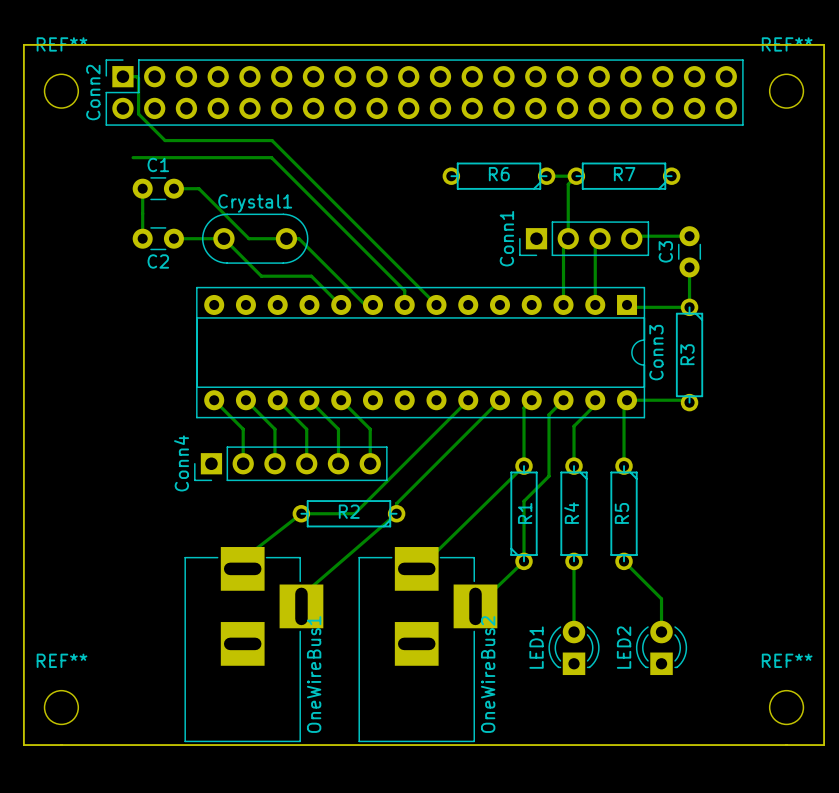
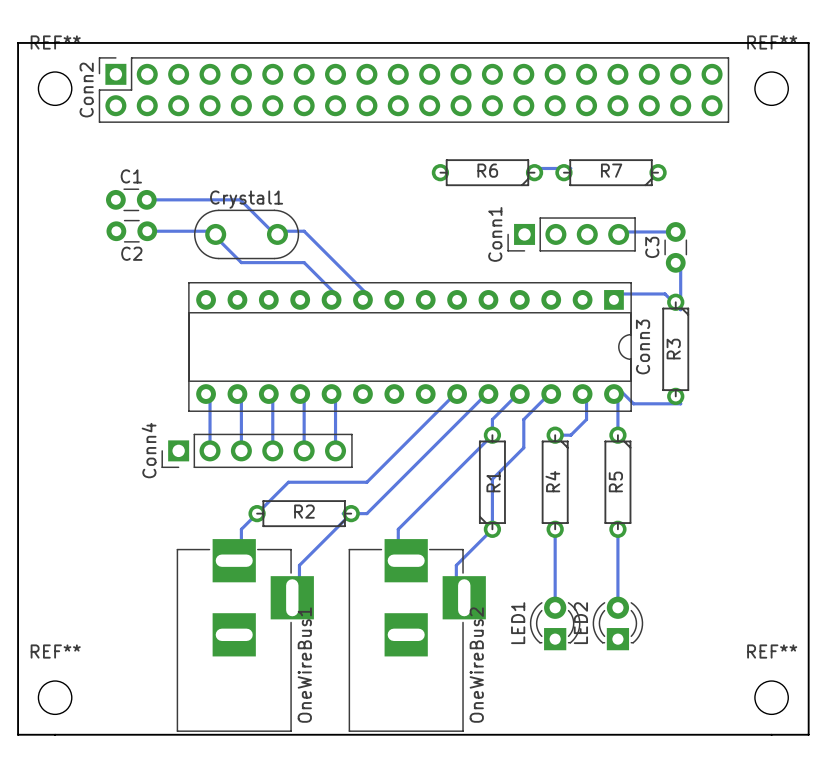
bottom track: (122, 76) (136, 76) (138, 78) (138, 114) (165, 140) (272, 140) (436, 304) -> none
bottom track: (133, 157) (271, 157) (404, 290) (404, 304) -> none
bottom track: none -> (539, 168) (570, 168)
bottom track: (546, 176) (576, 176) (568, 184) (568, 238) (563, 243) (563, 304) -> none
bottom track: (142, 188) (142, 238) -> none
C1 position: (158, 188) -> (131, 199)
bottom track: (173, 188) (198, 188) (248, 238) (298, 238) (365, 304) (372, 304) -> none
bottom track: none -> (146, 199) (240, 199) (271, 231) (304, 231) (366, 293) (359, 293)
bottom track: none -> (147, 231) (210, 231) (241, 262) (304, 262) (334, 293)
C2 position: (158, 238) -> (131, 231)
bottom track: (173, 238) (223, 238) (261, 276) (311, 276) (341, 304) -> none
bottom track: (600, 238) (595, 243) (595, 304) -> none
bottom track: (689, 267) (689, 307) (629, 307) (627, 304) -> none
bottom track: none -> (680, 262) (680, 309) (664, 293) (617, 293) (620, 296)
bottom track: none -> (210, 388) (210, 450)
bottom track: none -> (241, 388) (241, 450)
bottom track: none -> (272, 388) (272, 450)
bottom track: none -> (304, 388) (304, 450)
bottom track: none -> (335, 388) (335, 450)
bottom track: none -> (461, 388) (366, 482) (288, 482) (241, 529) (241, 576) (244, 576)
bottom track: none -> (492, 388) (366, 513) (343, 513)
bottom track: none -> (523, 388) (492, 419) (492, 435) (398, 529) (398, 576) (402, 576)
bottom track: none -> (555, 388) (523, 419) (523, 447) (492, 479) (492, 529) (456, 565) (456, 613) (459, 613)
bottom track: none -> (586, 388) (586, 419) (570, 435) (555, 435)
bottom track: (214, 400) (243, 429) (243, 463) -> none
bottom track: (245, 400) (274, 429) (274, 463) -> none
bottom track: (277, 400) (306, 429) (306, 463) -> none
bottom track: (309, 400) (338, 429) (338, 463) -> none
bottom track: (341, 400) (370, 429) (370, 463) -> none
bottom track: (468, 400) (354, 513) (301, 513) (242, 559) (242, 563) -> none
bottom track: (500, 400) (396, 503) (396, 513) (301, 595) (301, 601) -> none
bottom track: (531, 400) (524, 407) (524, 466) (419, 568) (416, 568) -> none
bottom track: (563, 400) (549, 414) (549, 476) (524, 501) (524, 561) (475, 606) -> none
bottom track: (595, 400) (595, 404) (574, 426) (574, 466) -> none
bottom track: (689, 402) (687, 400) (627, 400) (624, 403) (624, 466) -> none
bottom track: none -> (678, 401) (680, 403) (633, 403) (617, 388) (617, 435)
Conn4 position: (290, 463) -> (257, 450)
R2 position: (348, 513) -> (304, 513)
R1 position: (524, 513) -> (492, 482)
R4 position: (574, 513) -> (555, 482)
R5 position: (624, 513) -> (617, 482)
bottom track: none -> (351, 513) (299, 565) (299, 613)
bottom track: none -> (555, 529) (555, 607)
bottom track: none -> (617, 529) (617, 607)
bottom track: (574, 561) (574, 632) -> none
bottom track: (624, 561) (661, 598) (661, 632) -> none
LED1 position: (574, 647) -> (555, 623)
LED2 position: (661, 647) -> (617, 623)

